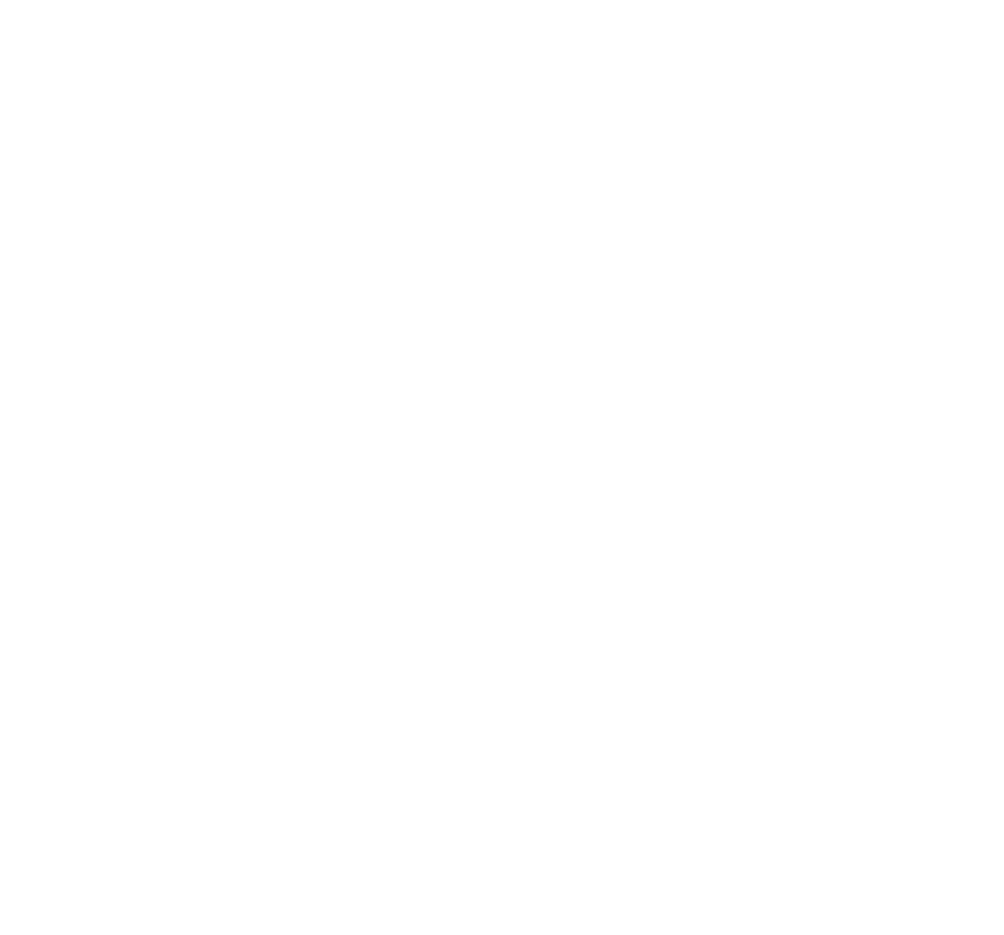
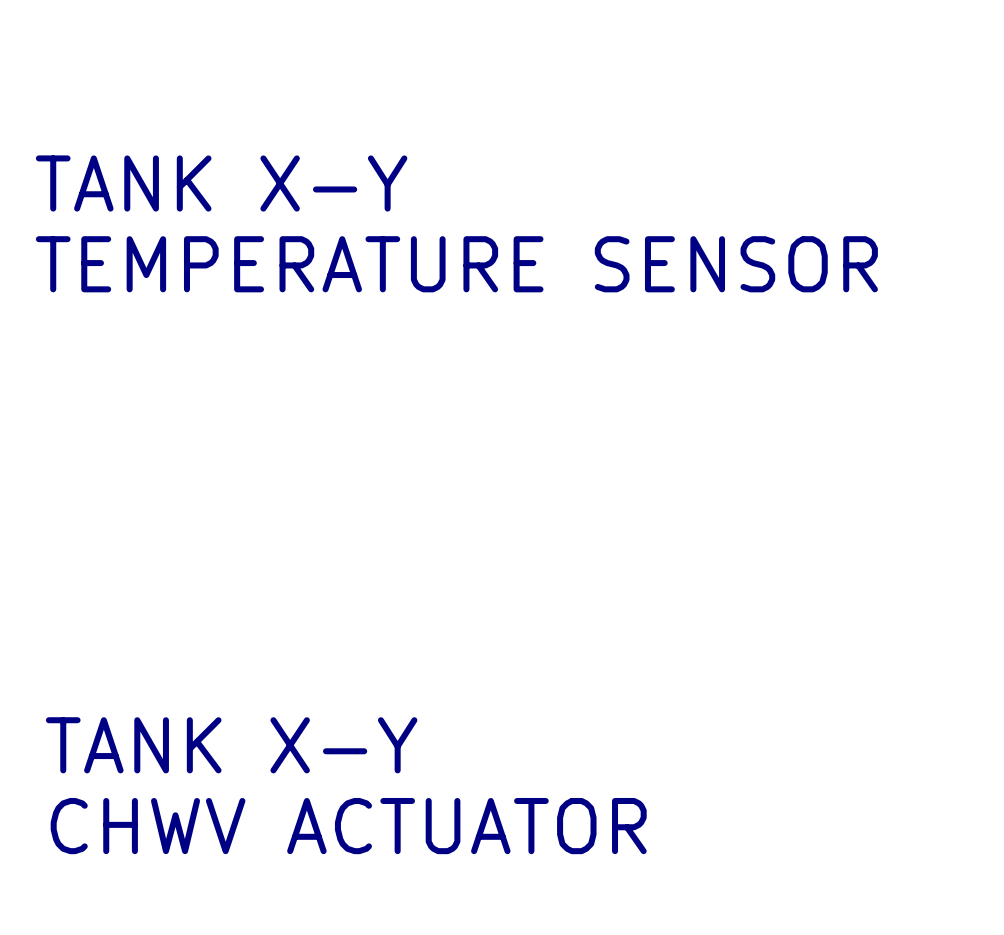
text: none -> TANK X-Y (221, 183)
text: none -> TEMPERATURE SENSOR (456, 264)
text: none -> TANK X-Y (231, 745)
text: none -> CHWV ACTUATOR (348, 826)

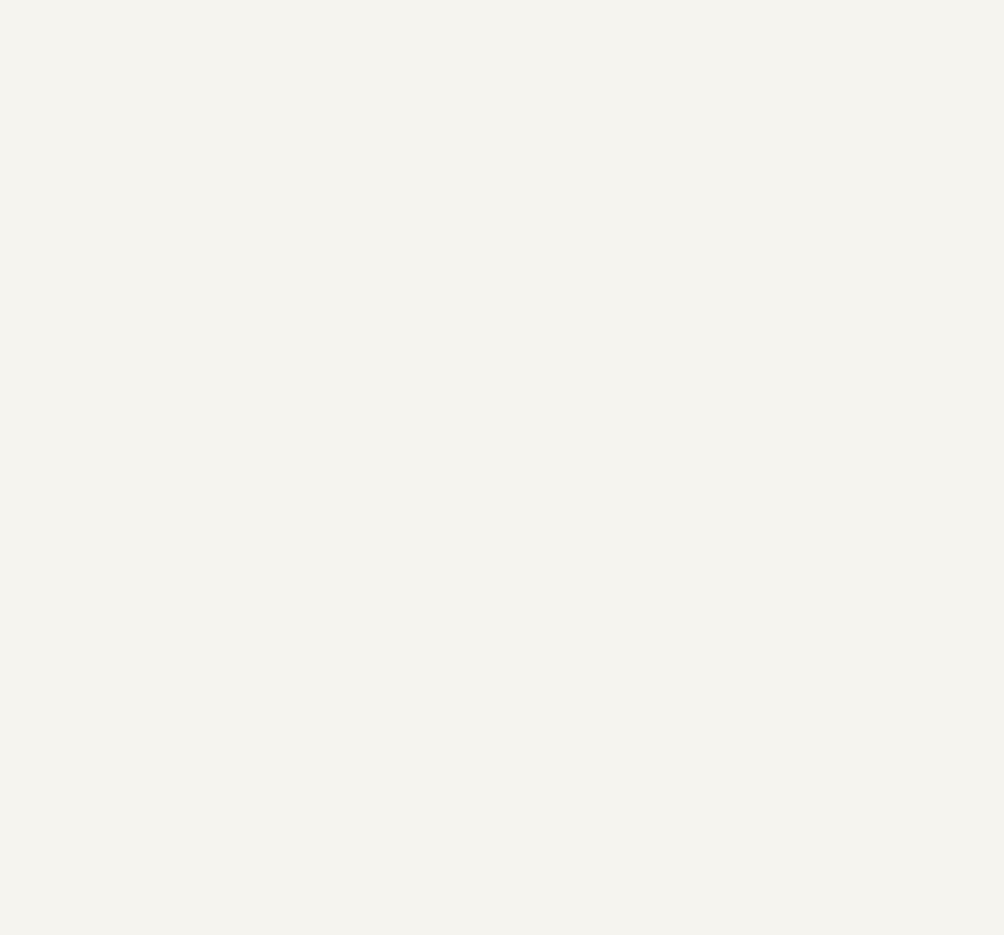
text: TANK X-Y (221, 183) -> none
text: TEMPERATURE SENSOR (456, 264) -> none
text: TANK X-Y (231, 745) -> none
text: CHWV ACTUATOR (348, 826) -> none

